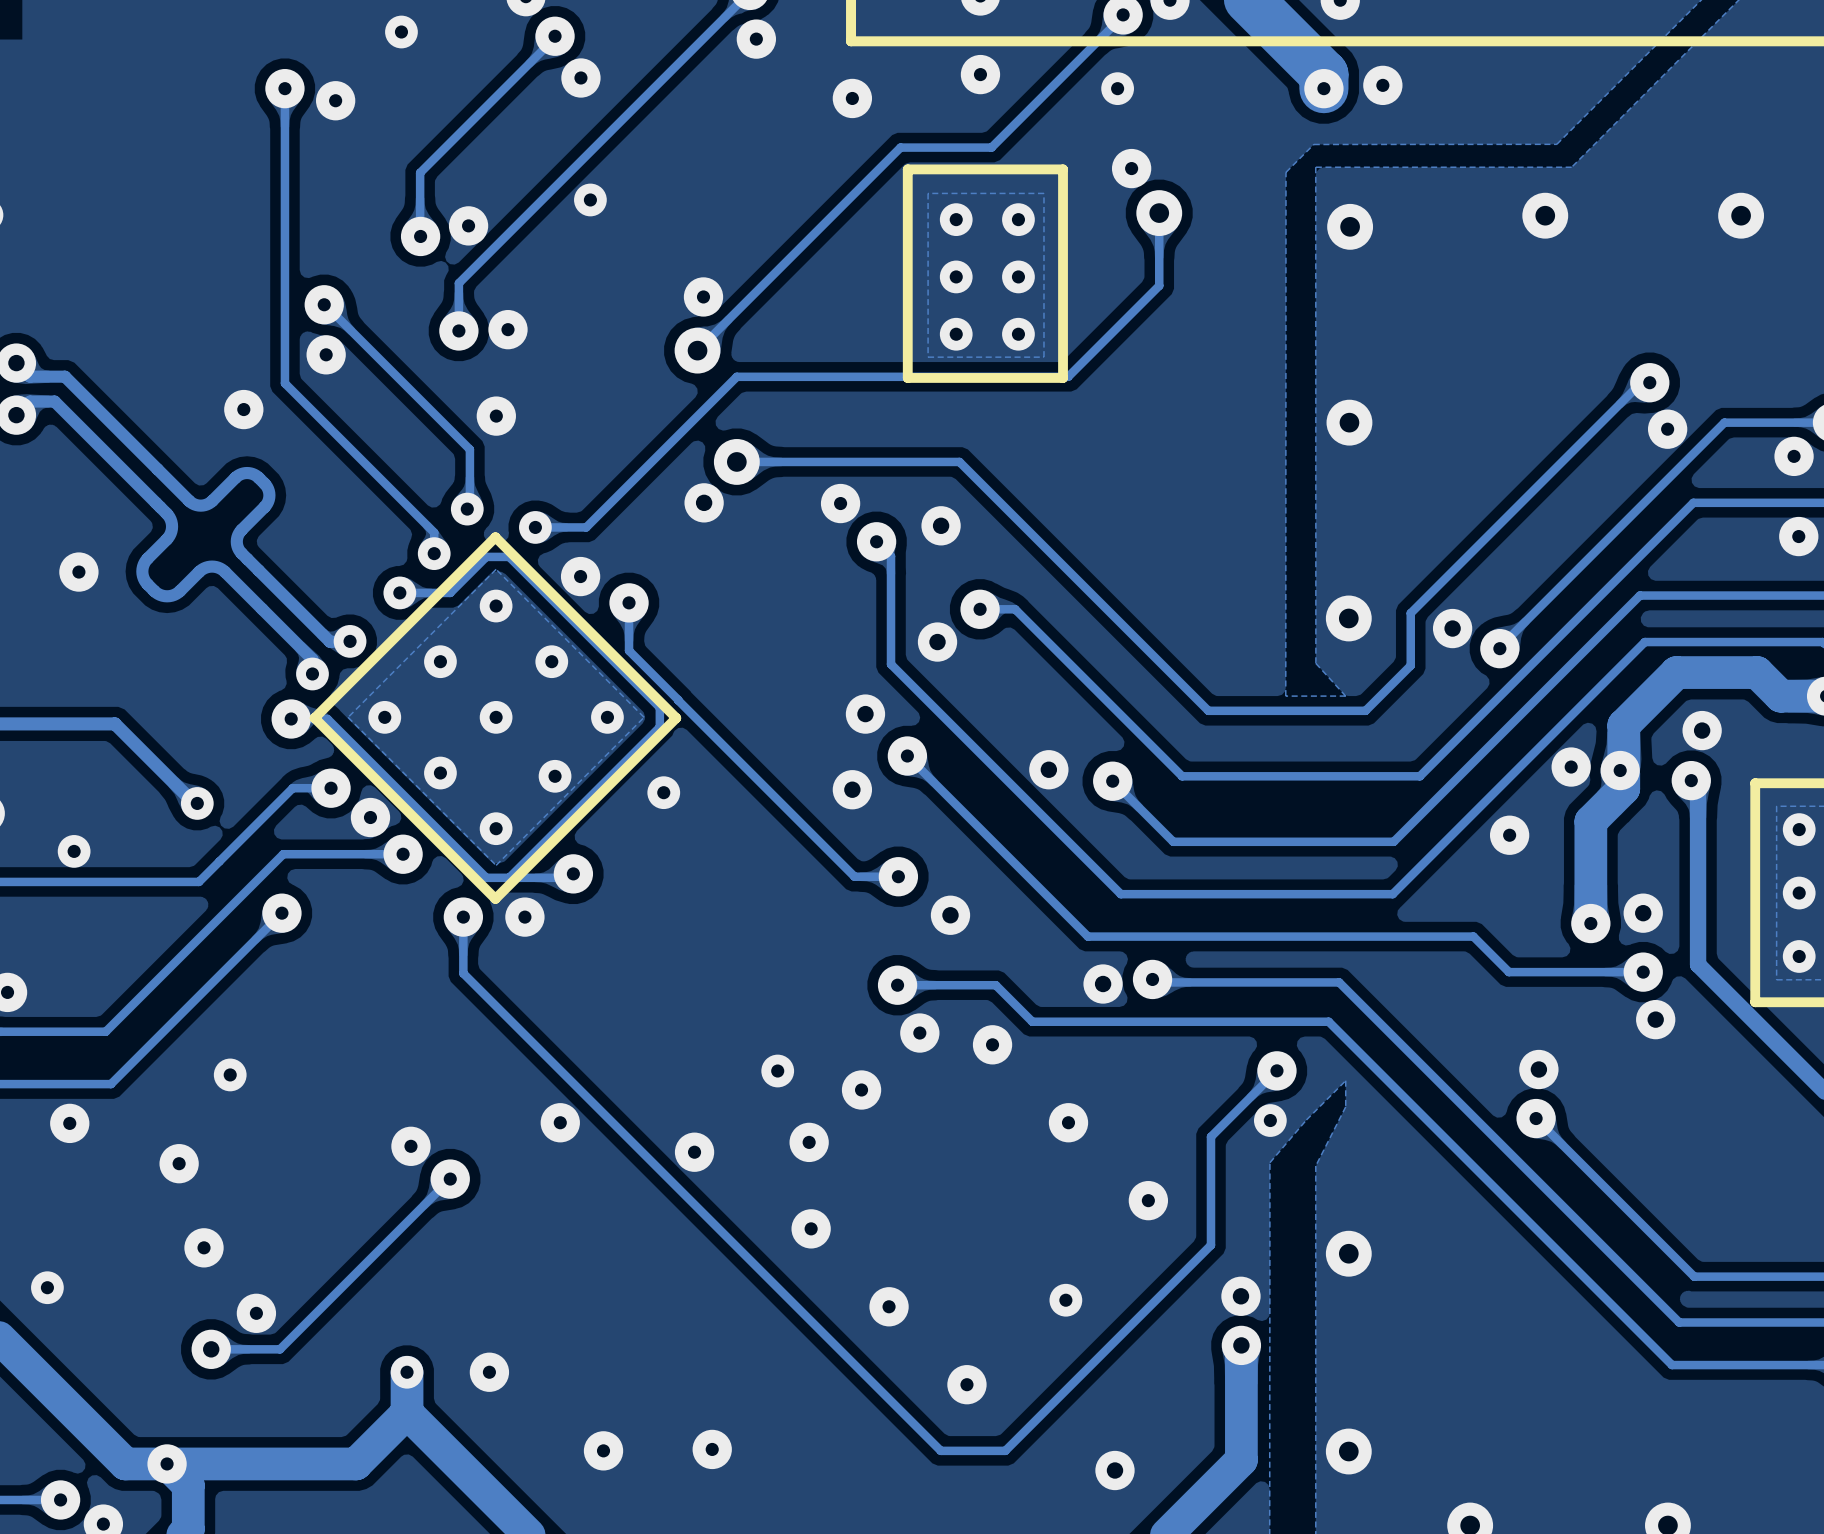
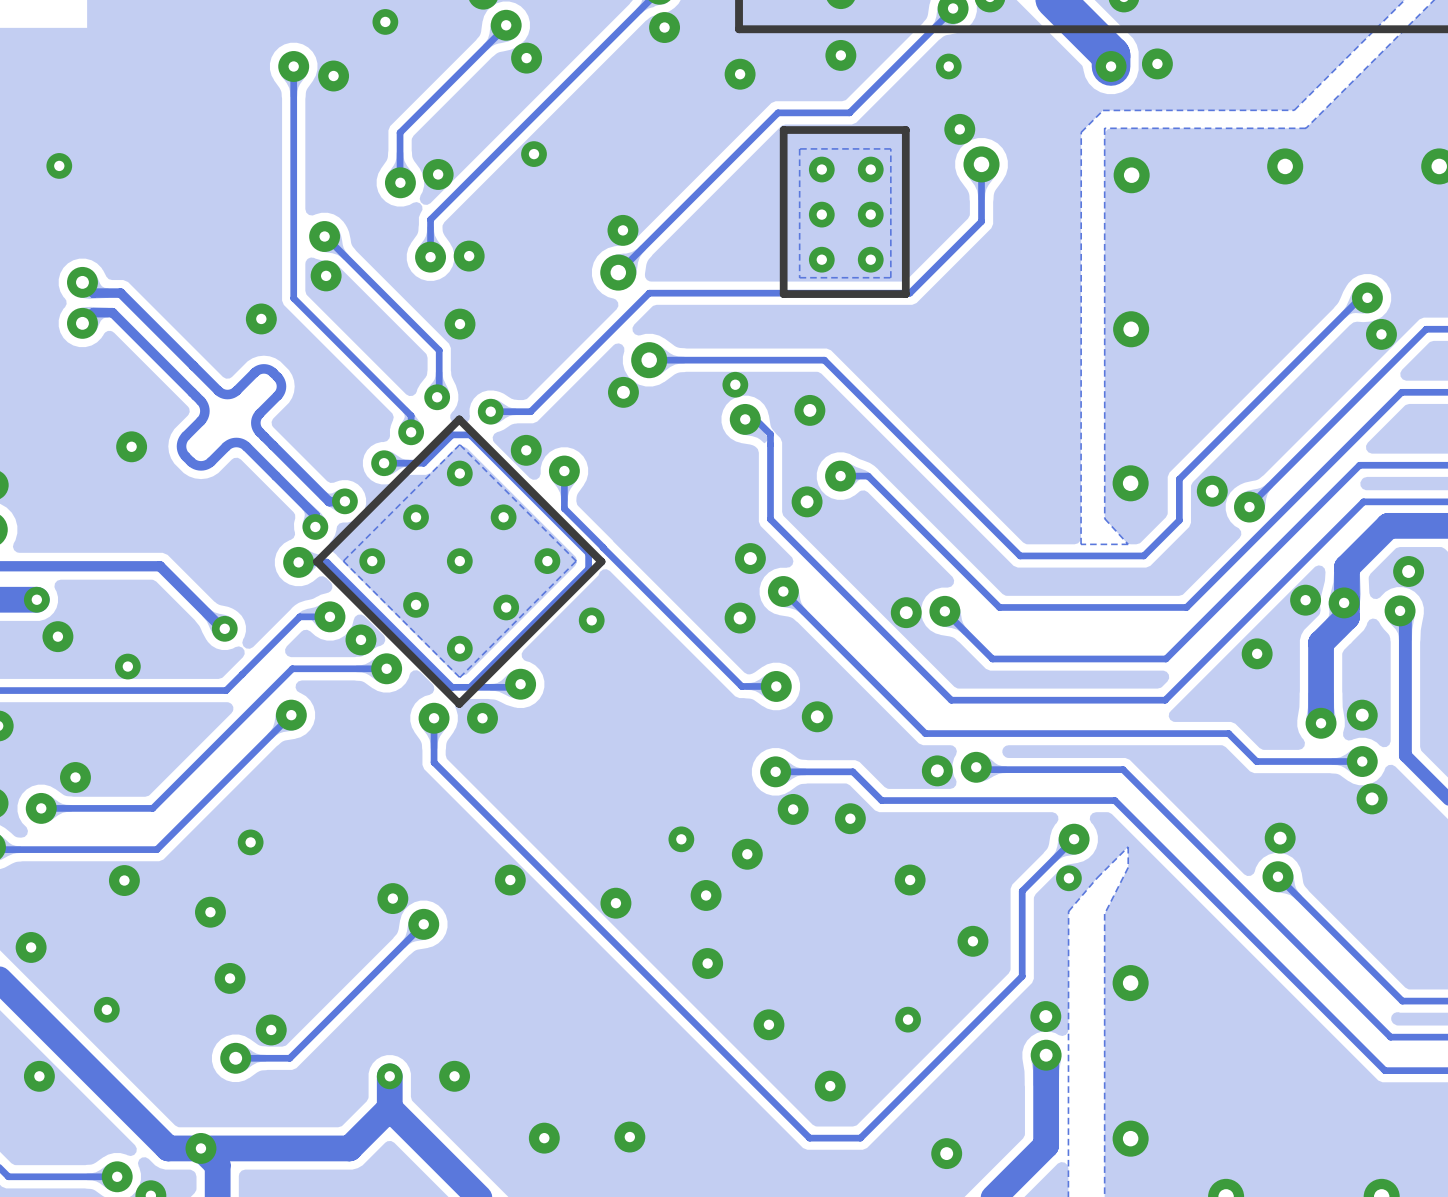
via size: [820, 483, 861, 524] -> [722, 371, 749, 398]
via position: (876, 541) -> (745, 419)
via position: (1048, 769) -> (906, 612)

